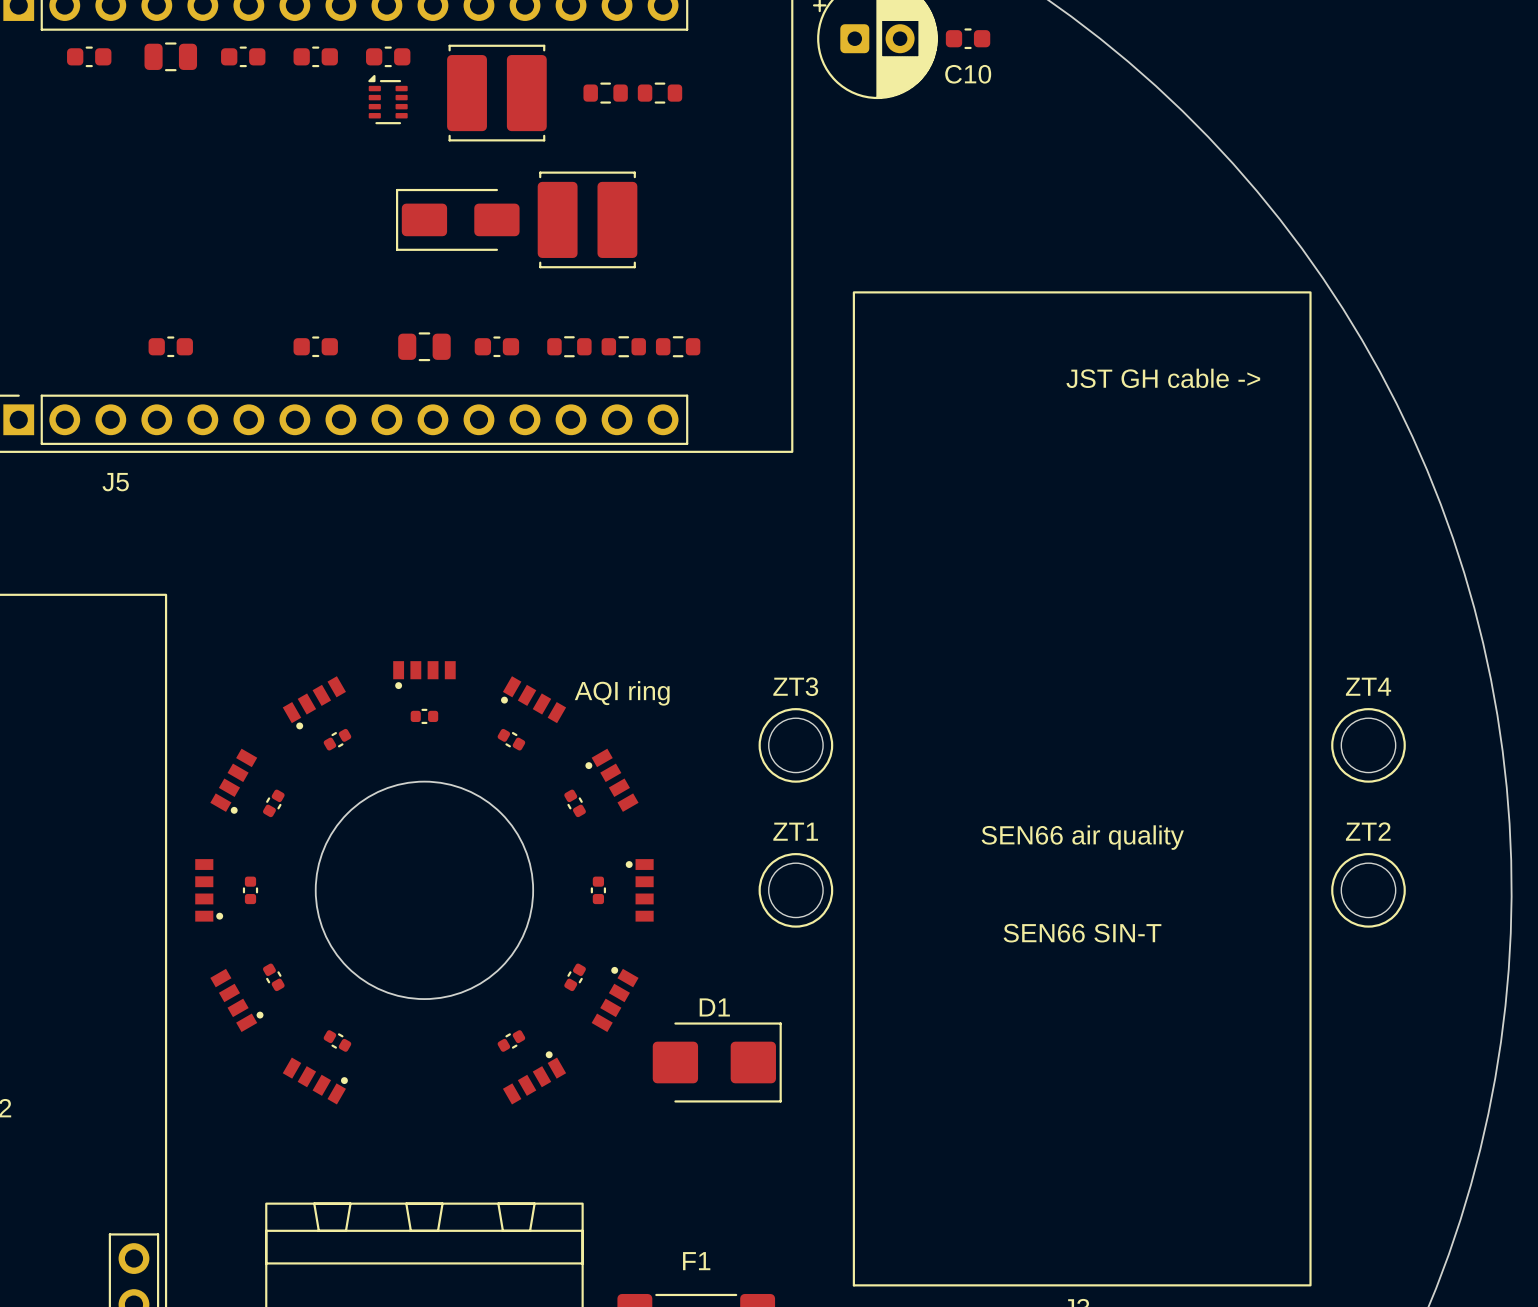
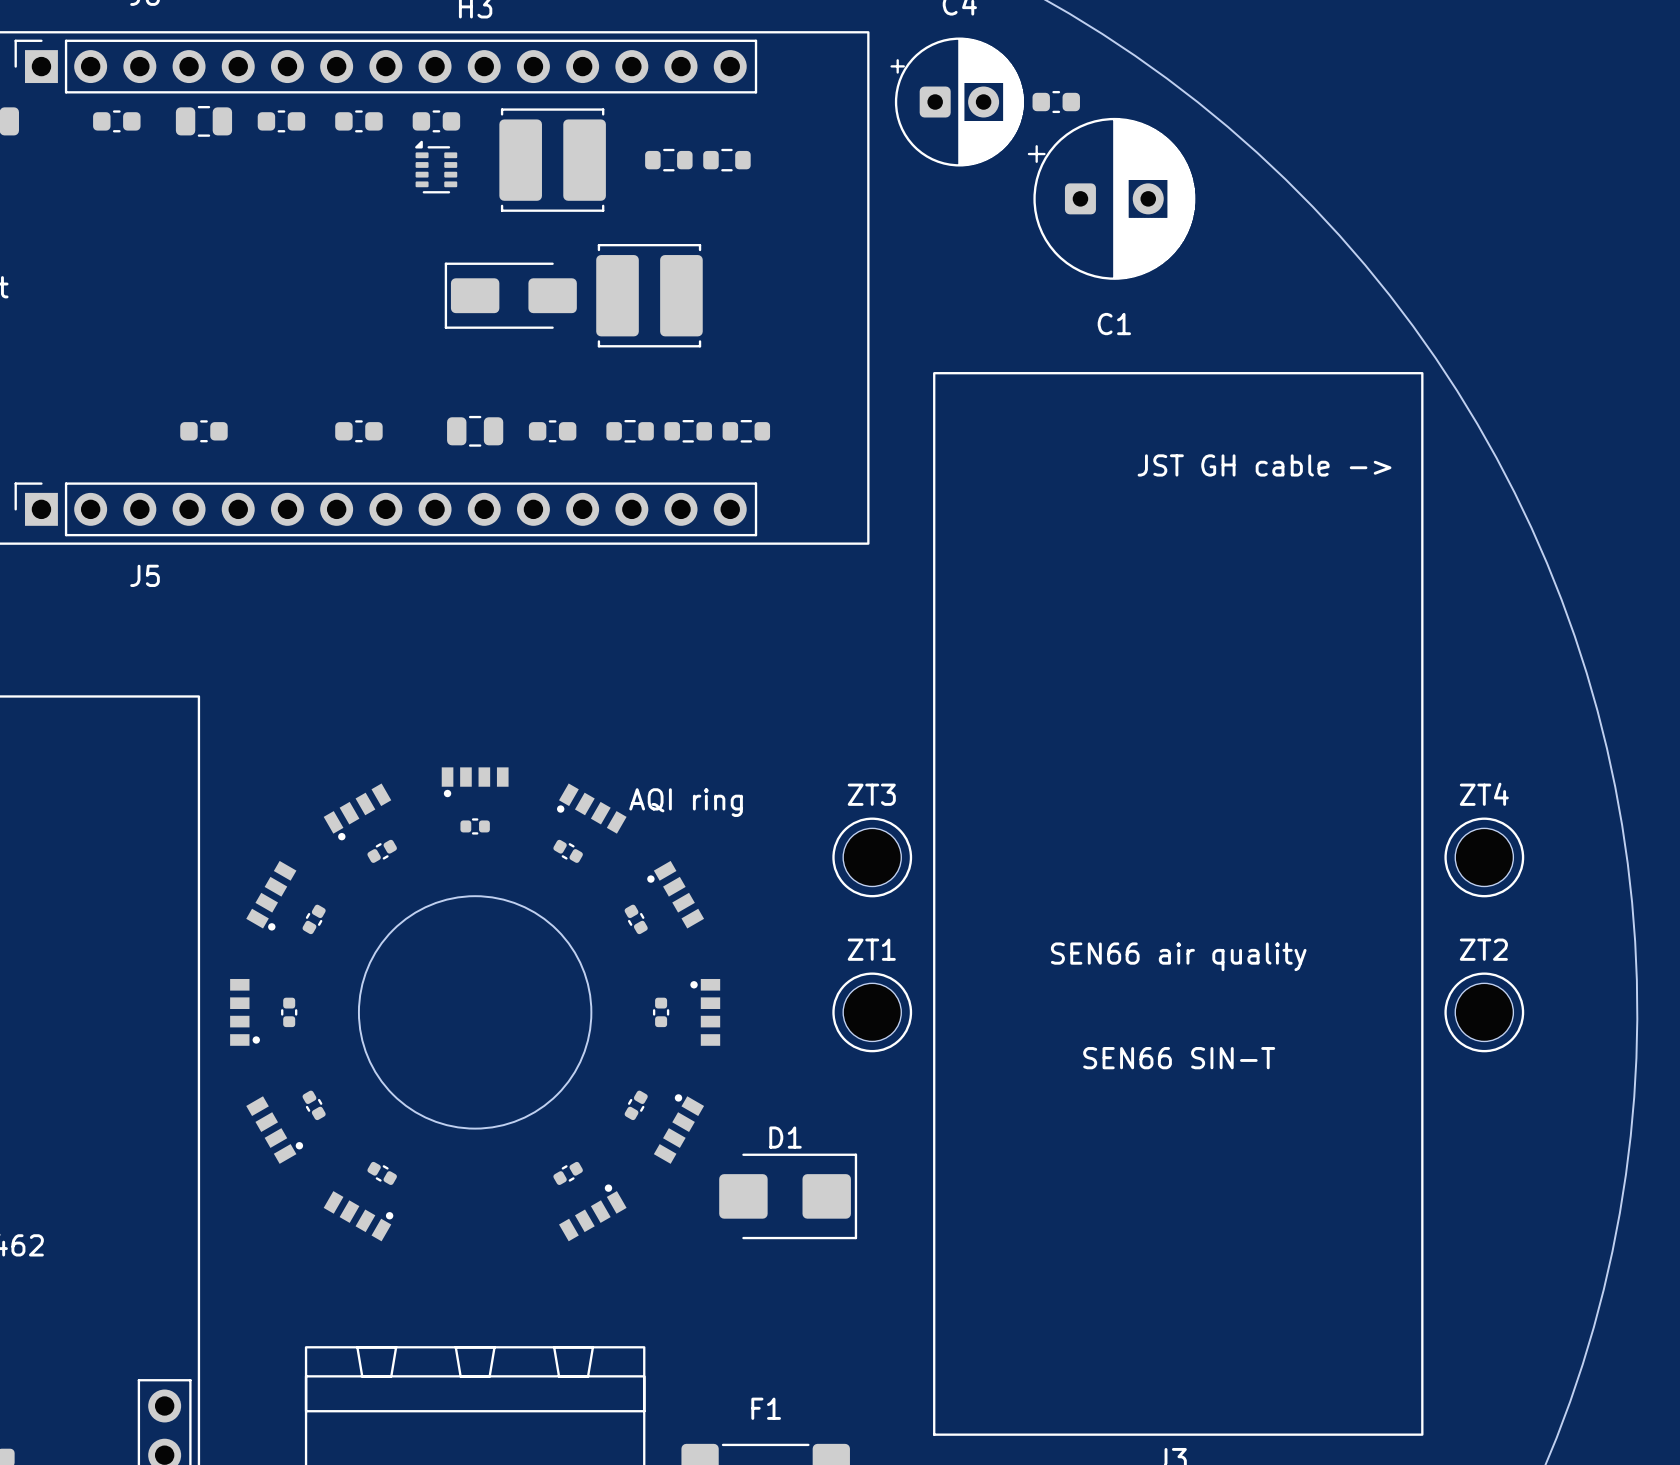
text: C10 (968, 74) -> none
part: none -> (1111, 198)
text: none -> C1 (1114, 324)

